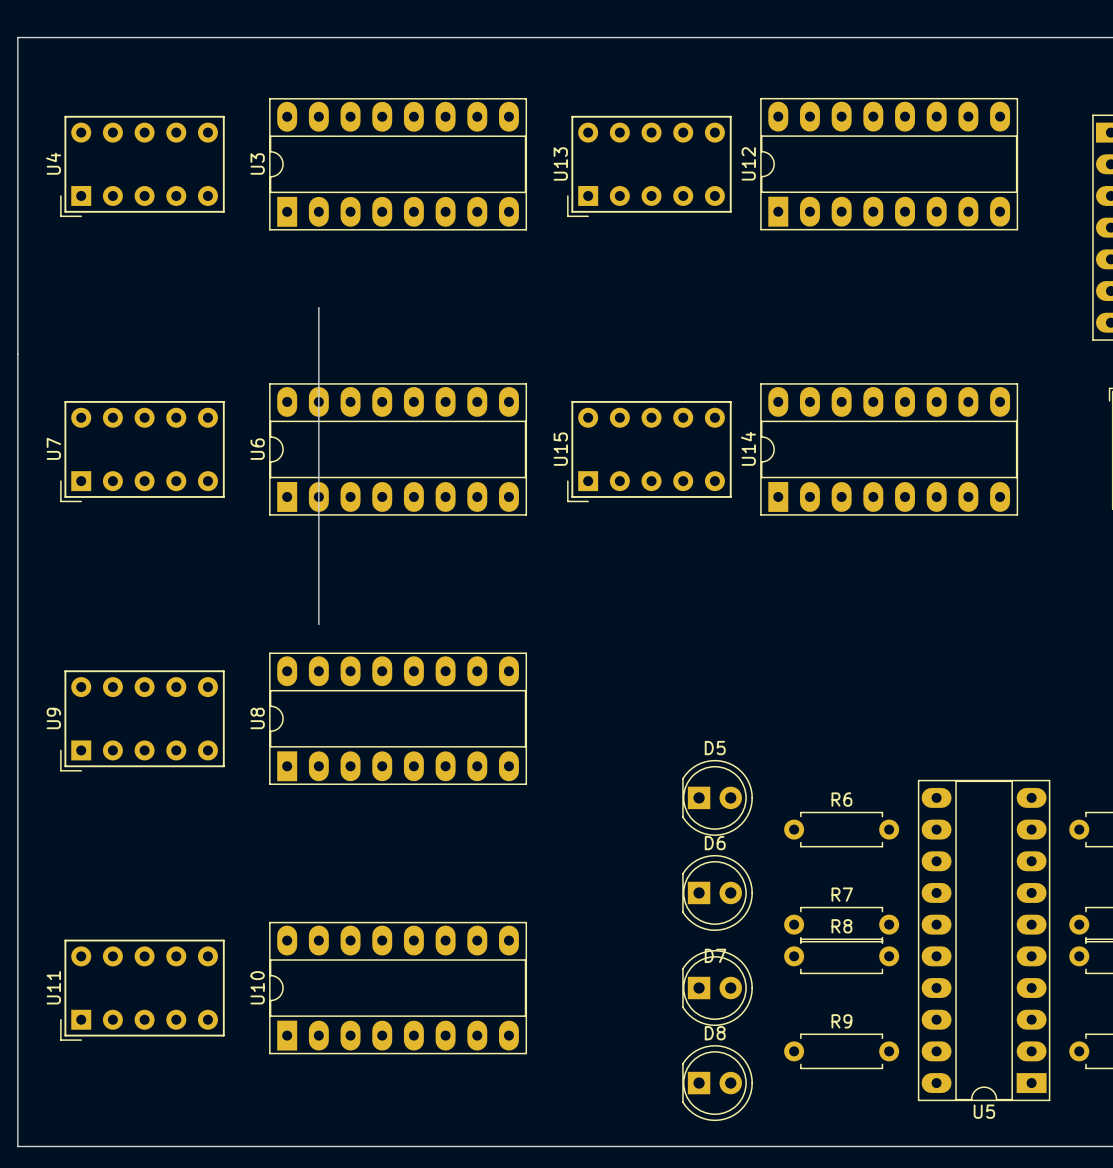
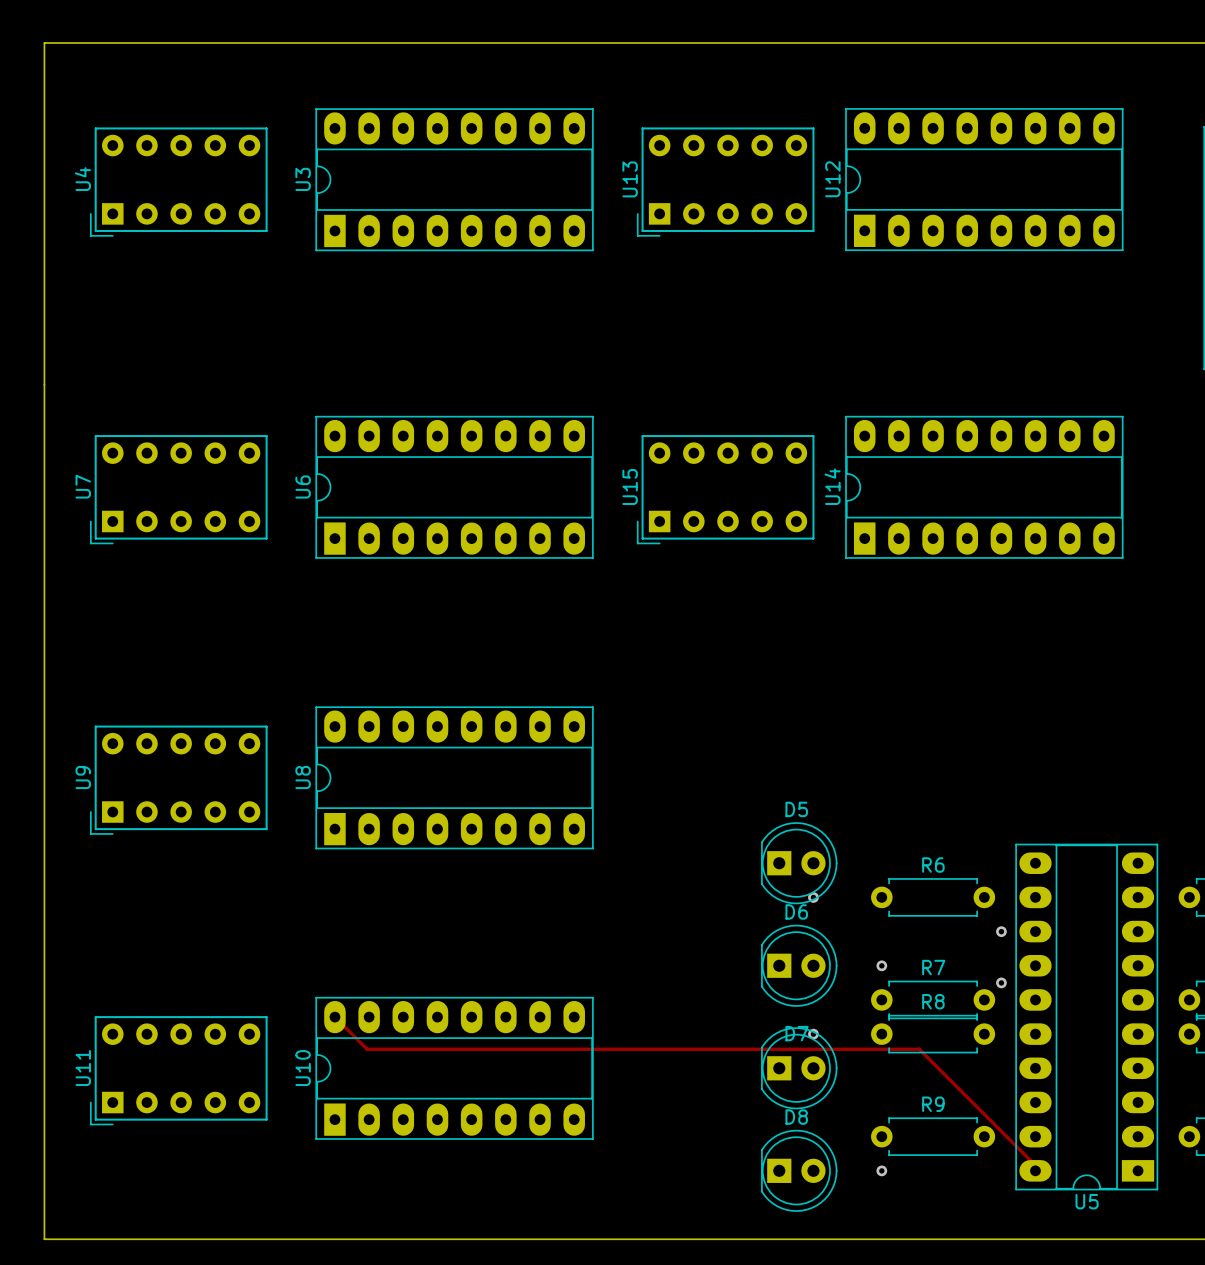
board edge: (318, 307) (318, 624) -> none
via: none -> (813, 897)
via: none -> (1001, 931)
via: none -> (881, 965)
via: none -> (1001, 982)
track: none -> (334, 1017) (367, 1049) (919, 1049) (1035, 1165) (1035, 1170)
via: none -> (813, 1034)
via: none -> (881, 1170)

